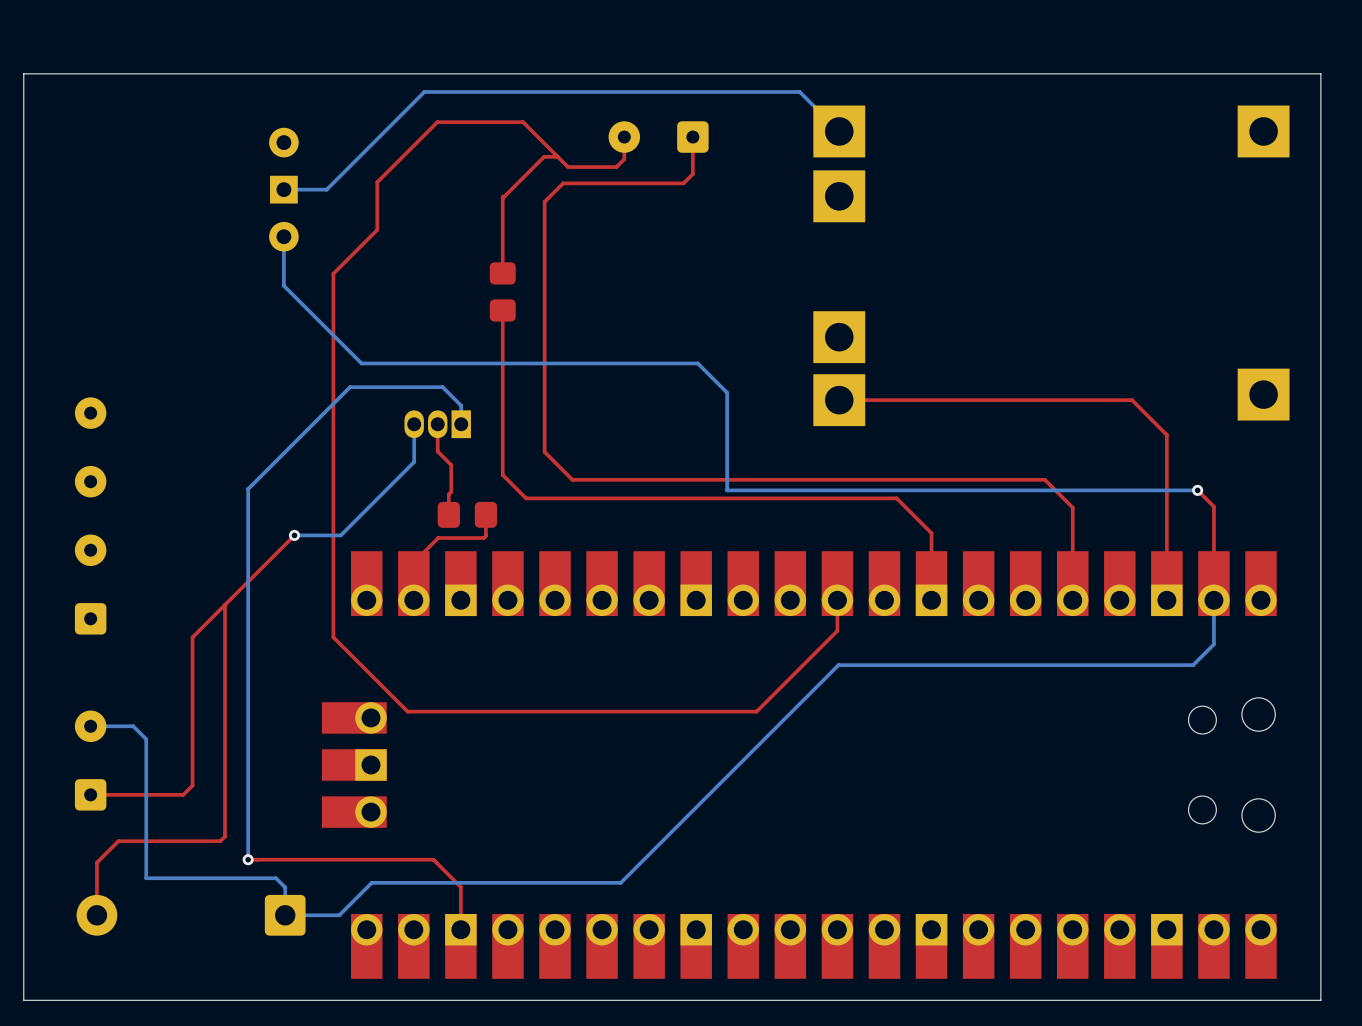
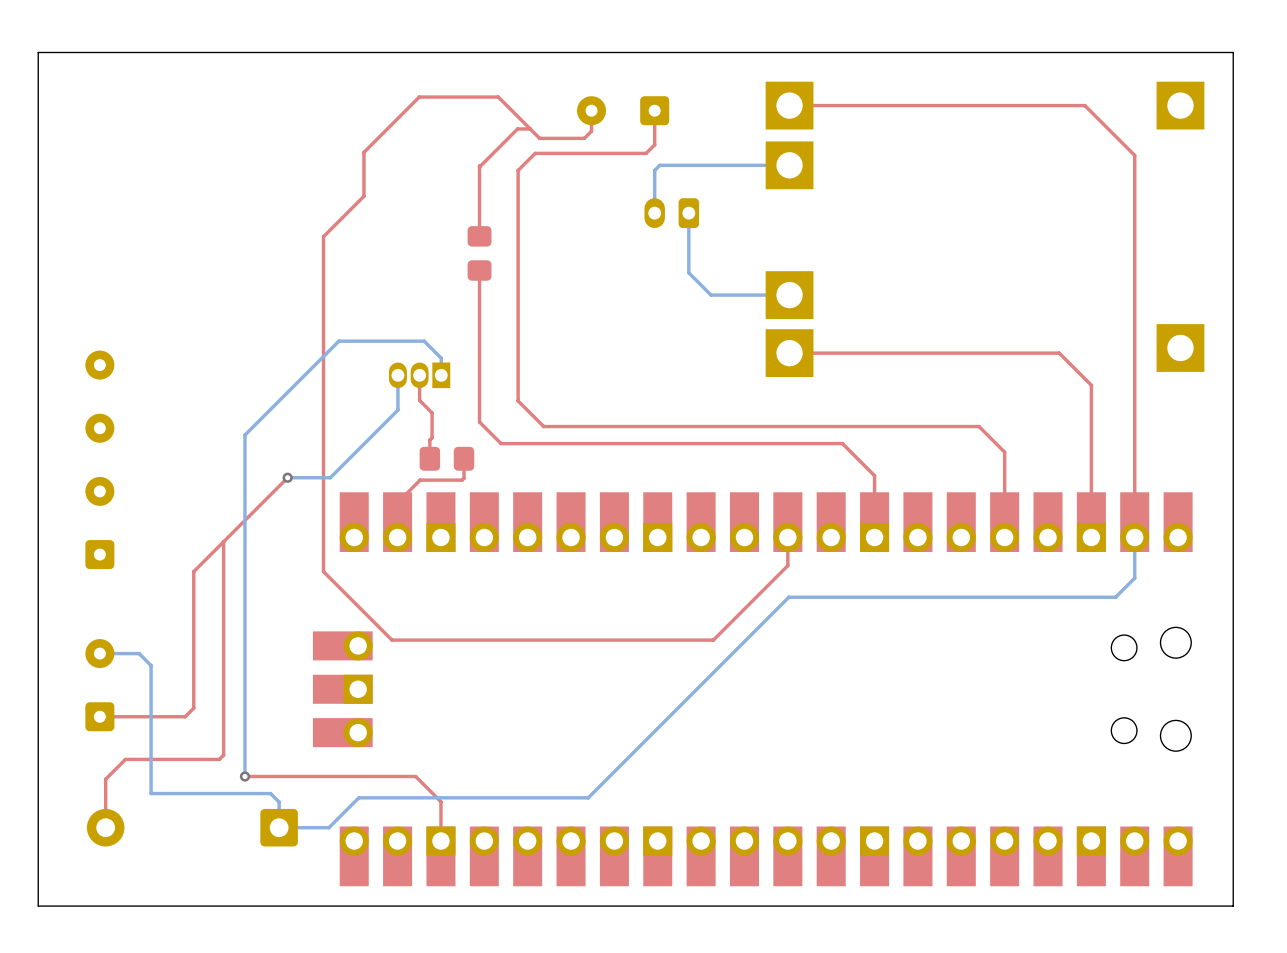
bottom track: (839, 131) (799, 92) (424, 92) (326, 189) (283, 189) -> none
part: (283, 189) -> none
bottom track: none -> (789, 165) (659, 165) (654, 170) (654, 213)
bottom track: (283, 236) (283, 285) (361, 363) (697, 363) (727, 392) (727, 490) (1197, 490) -> none
part: none -> (671, 213)
bottom track: none -> (688, 213) (688, 272) (711, 295) (789, 295)
top track: (1197, 490) (1213, 506) -> (789, 105) (1084, 105) (1134, 155) (1134, 451)
via: (1197, 490) -> none

